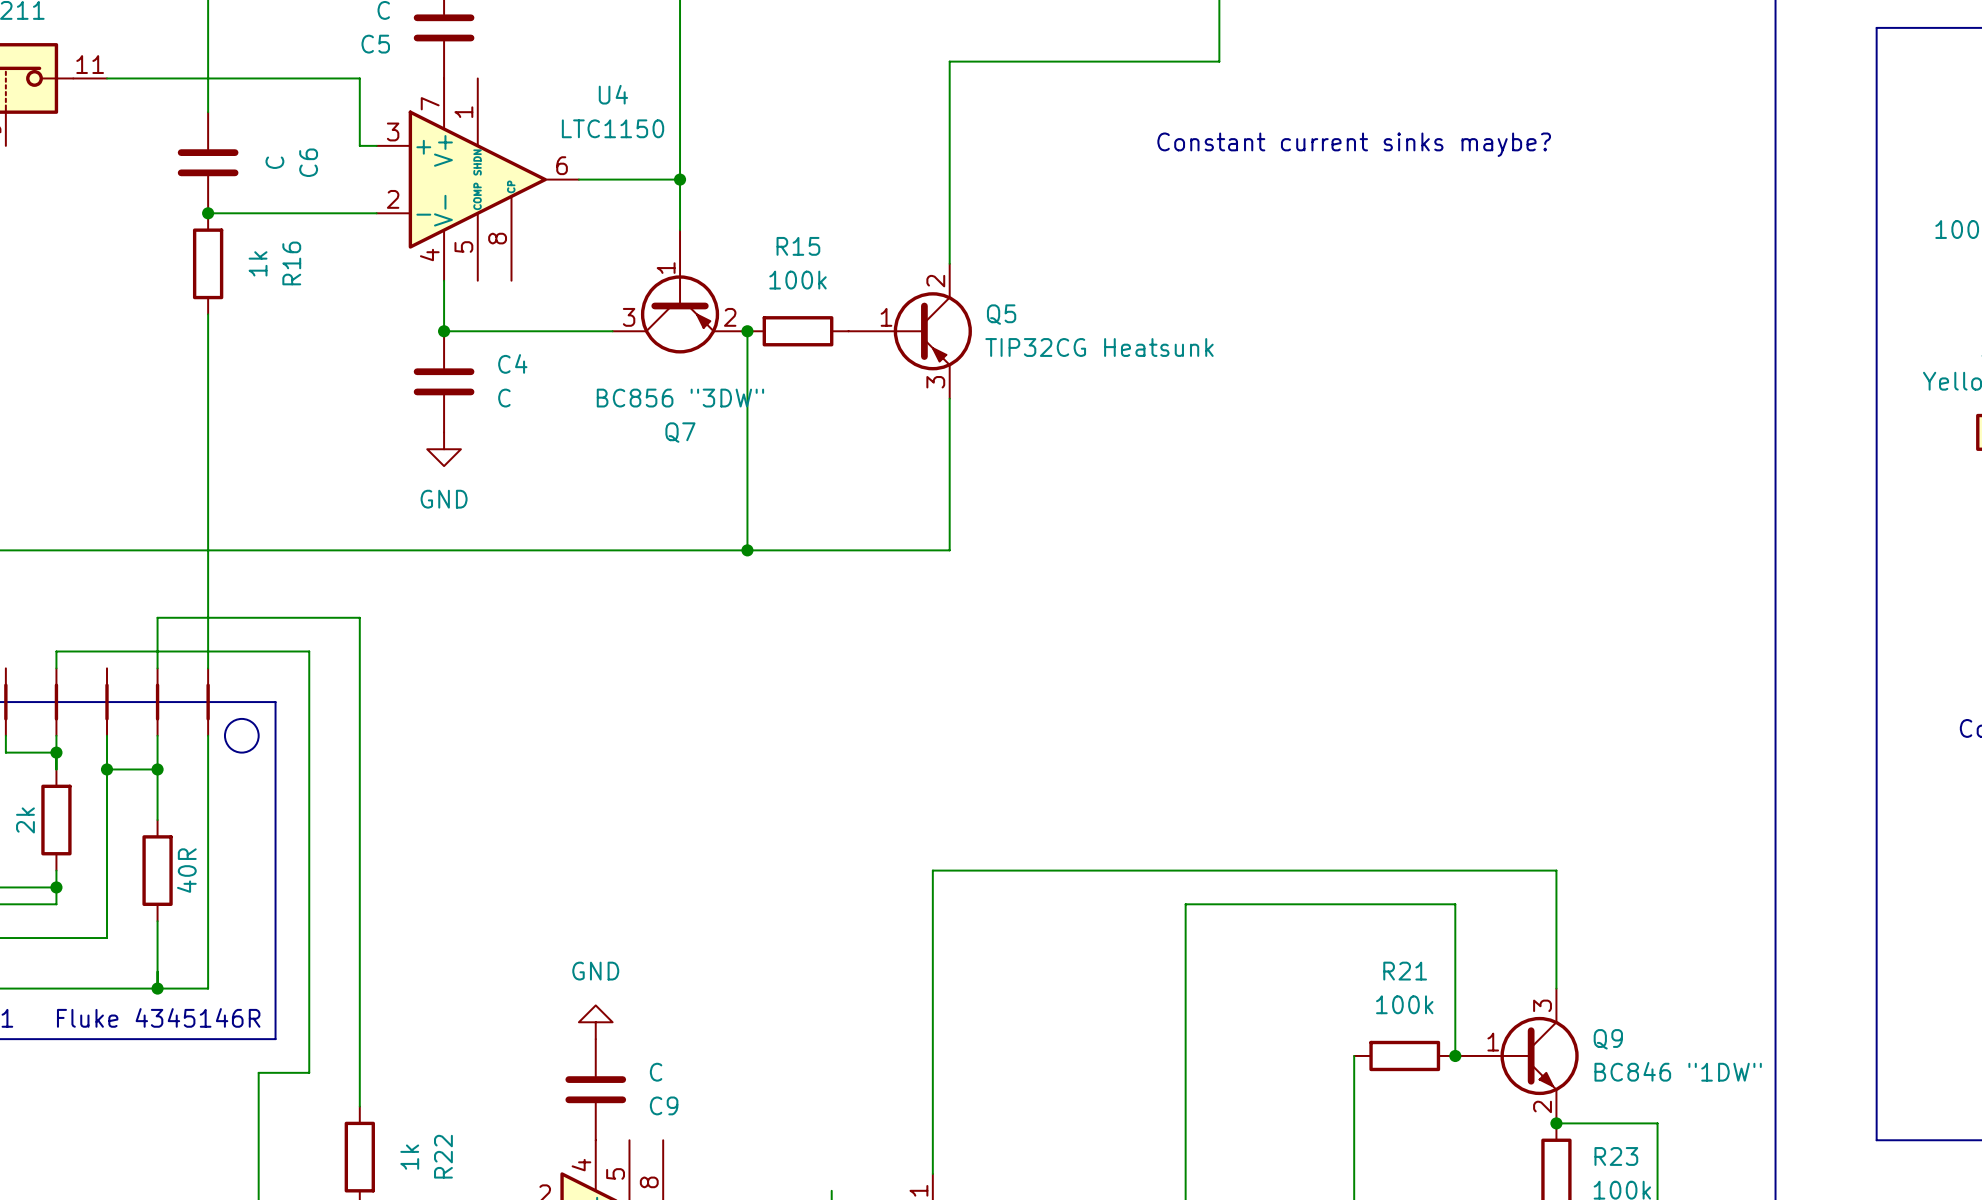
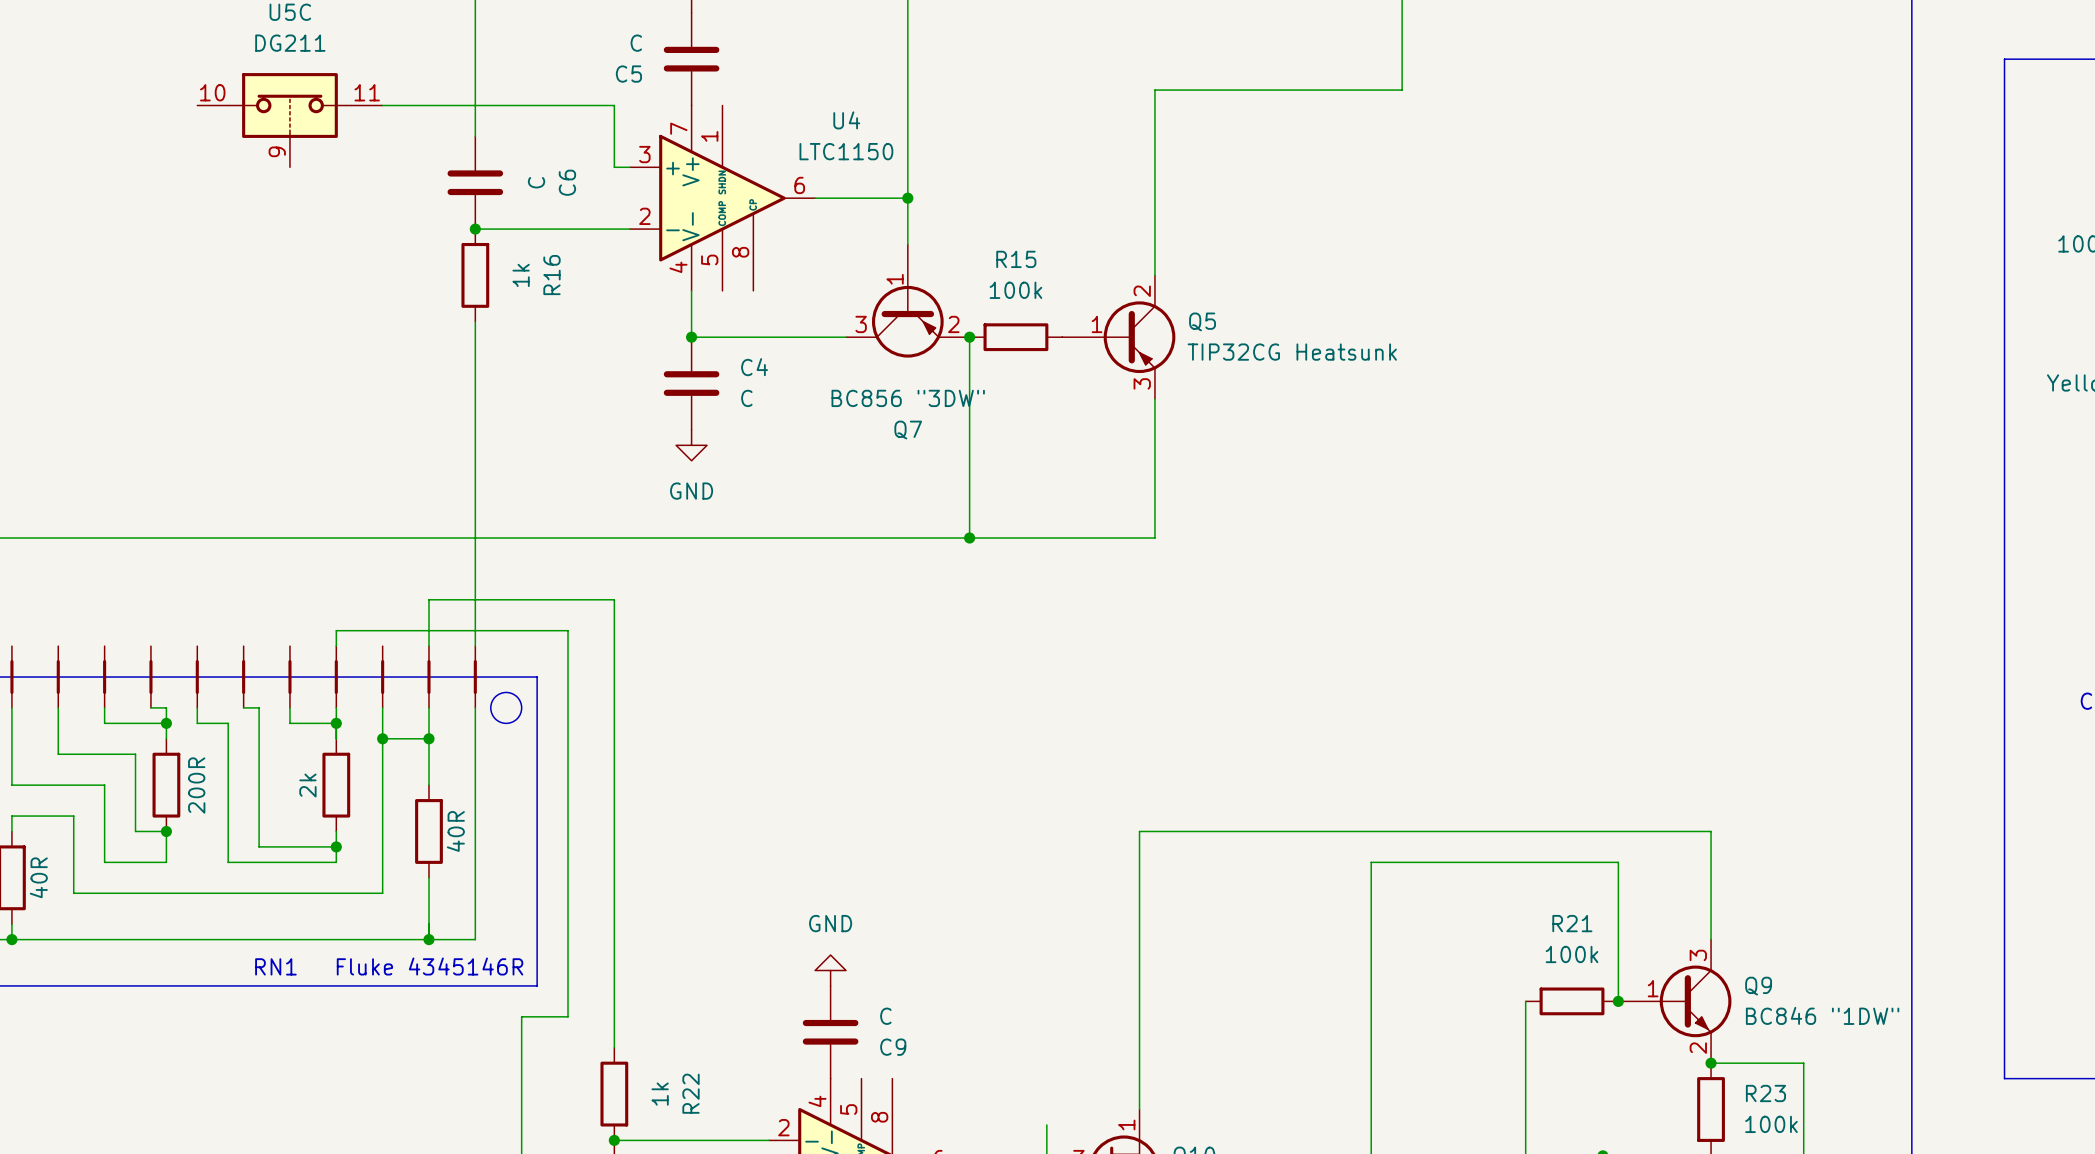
text: Constant current sinks maybe? (1354, 144) -> none

